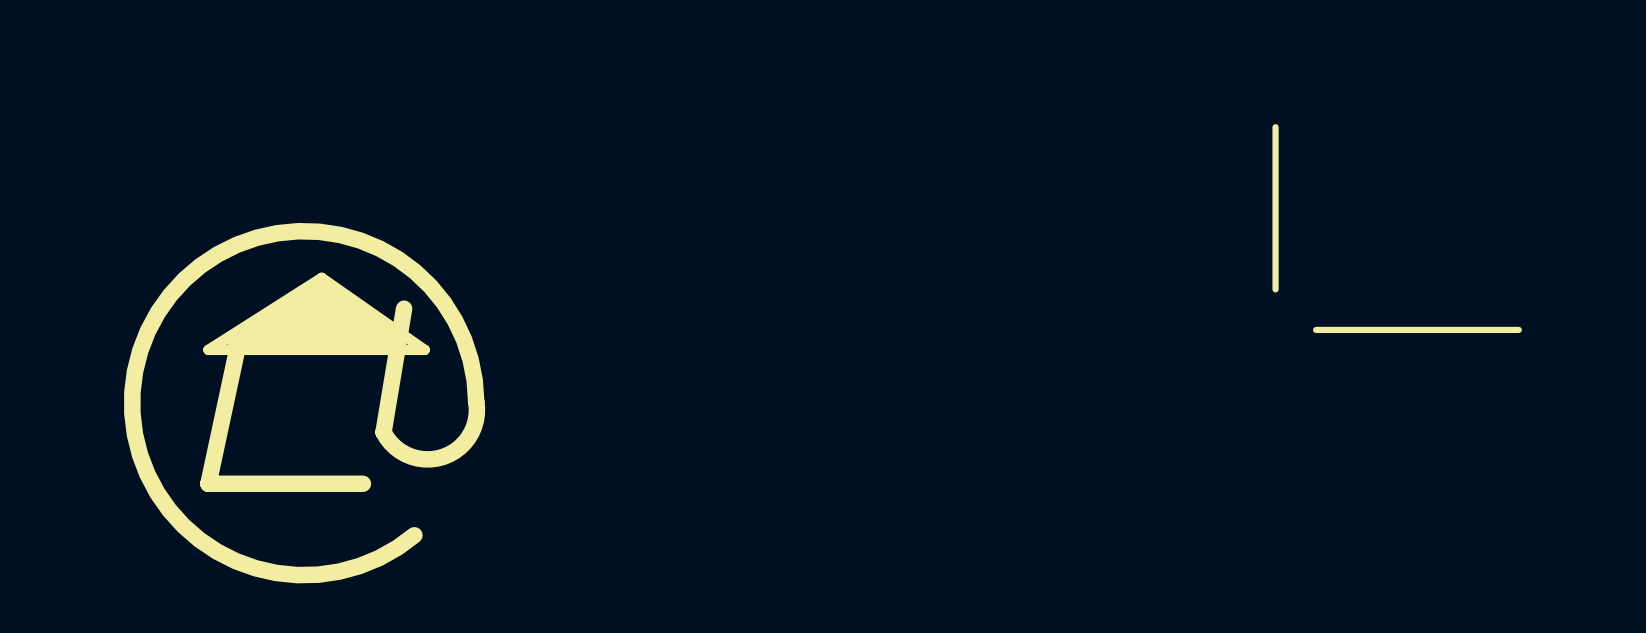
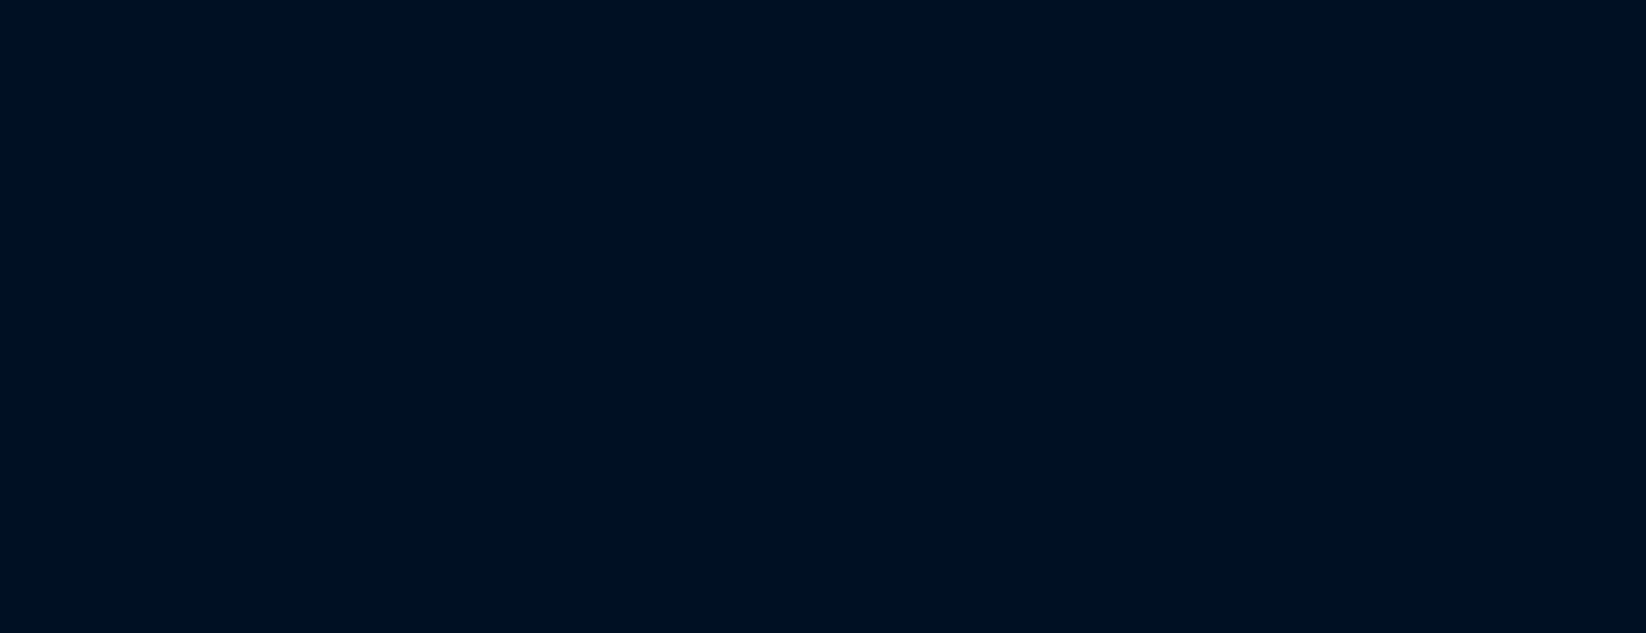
line: (1275, 127) (1275, 289) -> none
line: (321, 277) (208, 349) (424, 349) (321, 277) -> none
line: (321, 308) (301, 318) (352, 318) (321, 298) (259, 329) (373, 329) -> none
line: (404, 308) (383, 432) (395, 447) (411, 456) (424, 459) (443, 456) (454, 451) (464, 443) (471, 432) (476, 414) (474, 380) (470, 359) (455, 320) (430, 286) (398, 259) (360, 240) (319, 231) (298, 231) (256, 237) (217, 254) (184, 279) (170, 295) (147, 331) (135, 371) (132, 413) (139, 454) (147, 474) (169, 510) (199, 539) (235, 561) (255, 568) (297, 575) (339, 571) (379, 558) (414, 535) -> none
line: (1316, 329) (1518, 329) -> none
line: (229, 339) (393, 339) (321, 288) (239, 339) (208, 483) (362, 483) -> none

